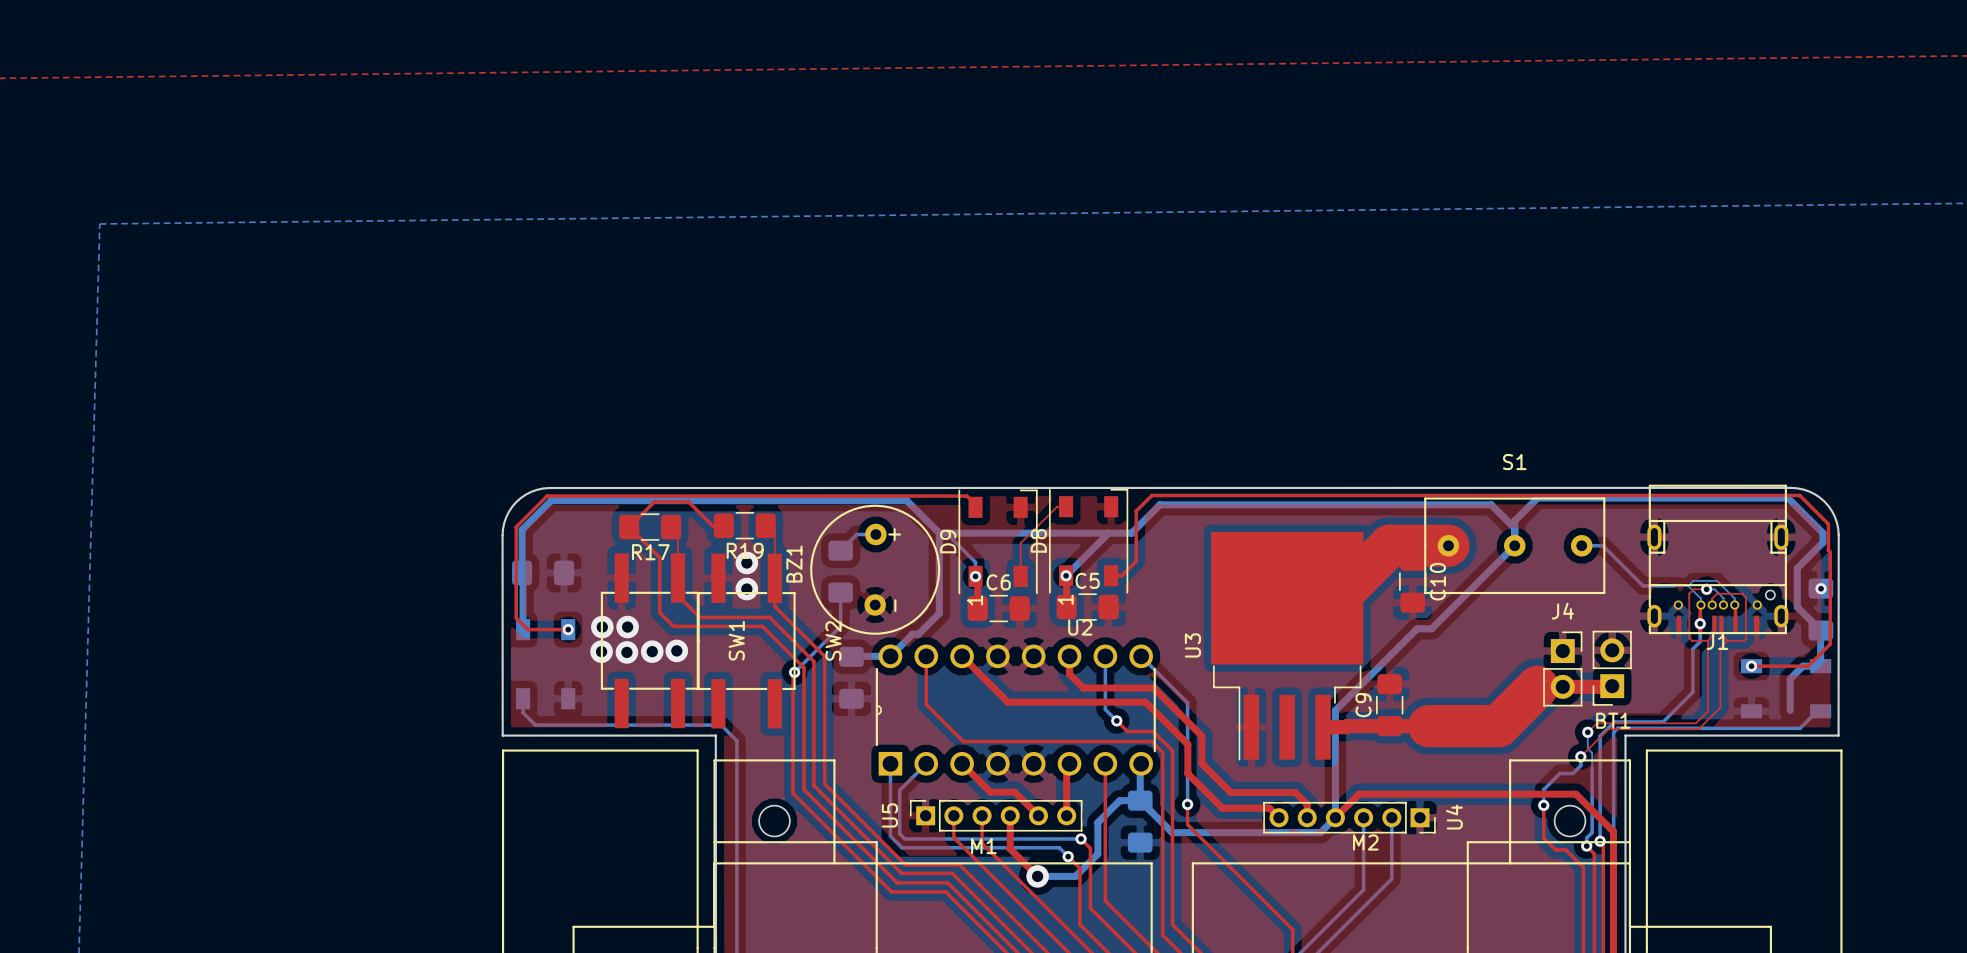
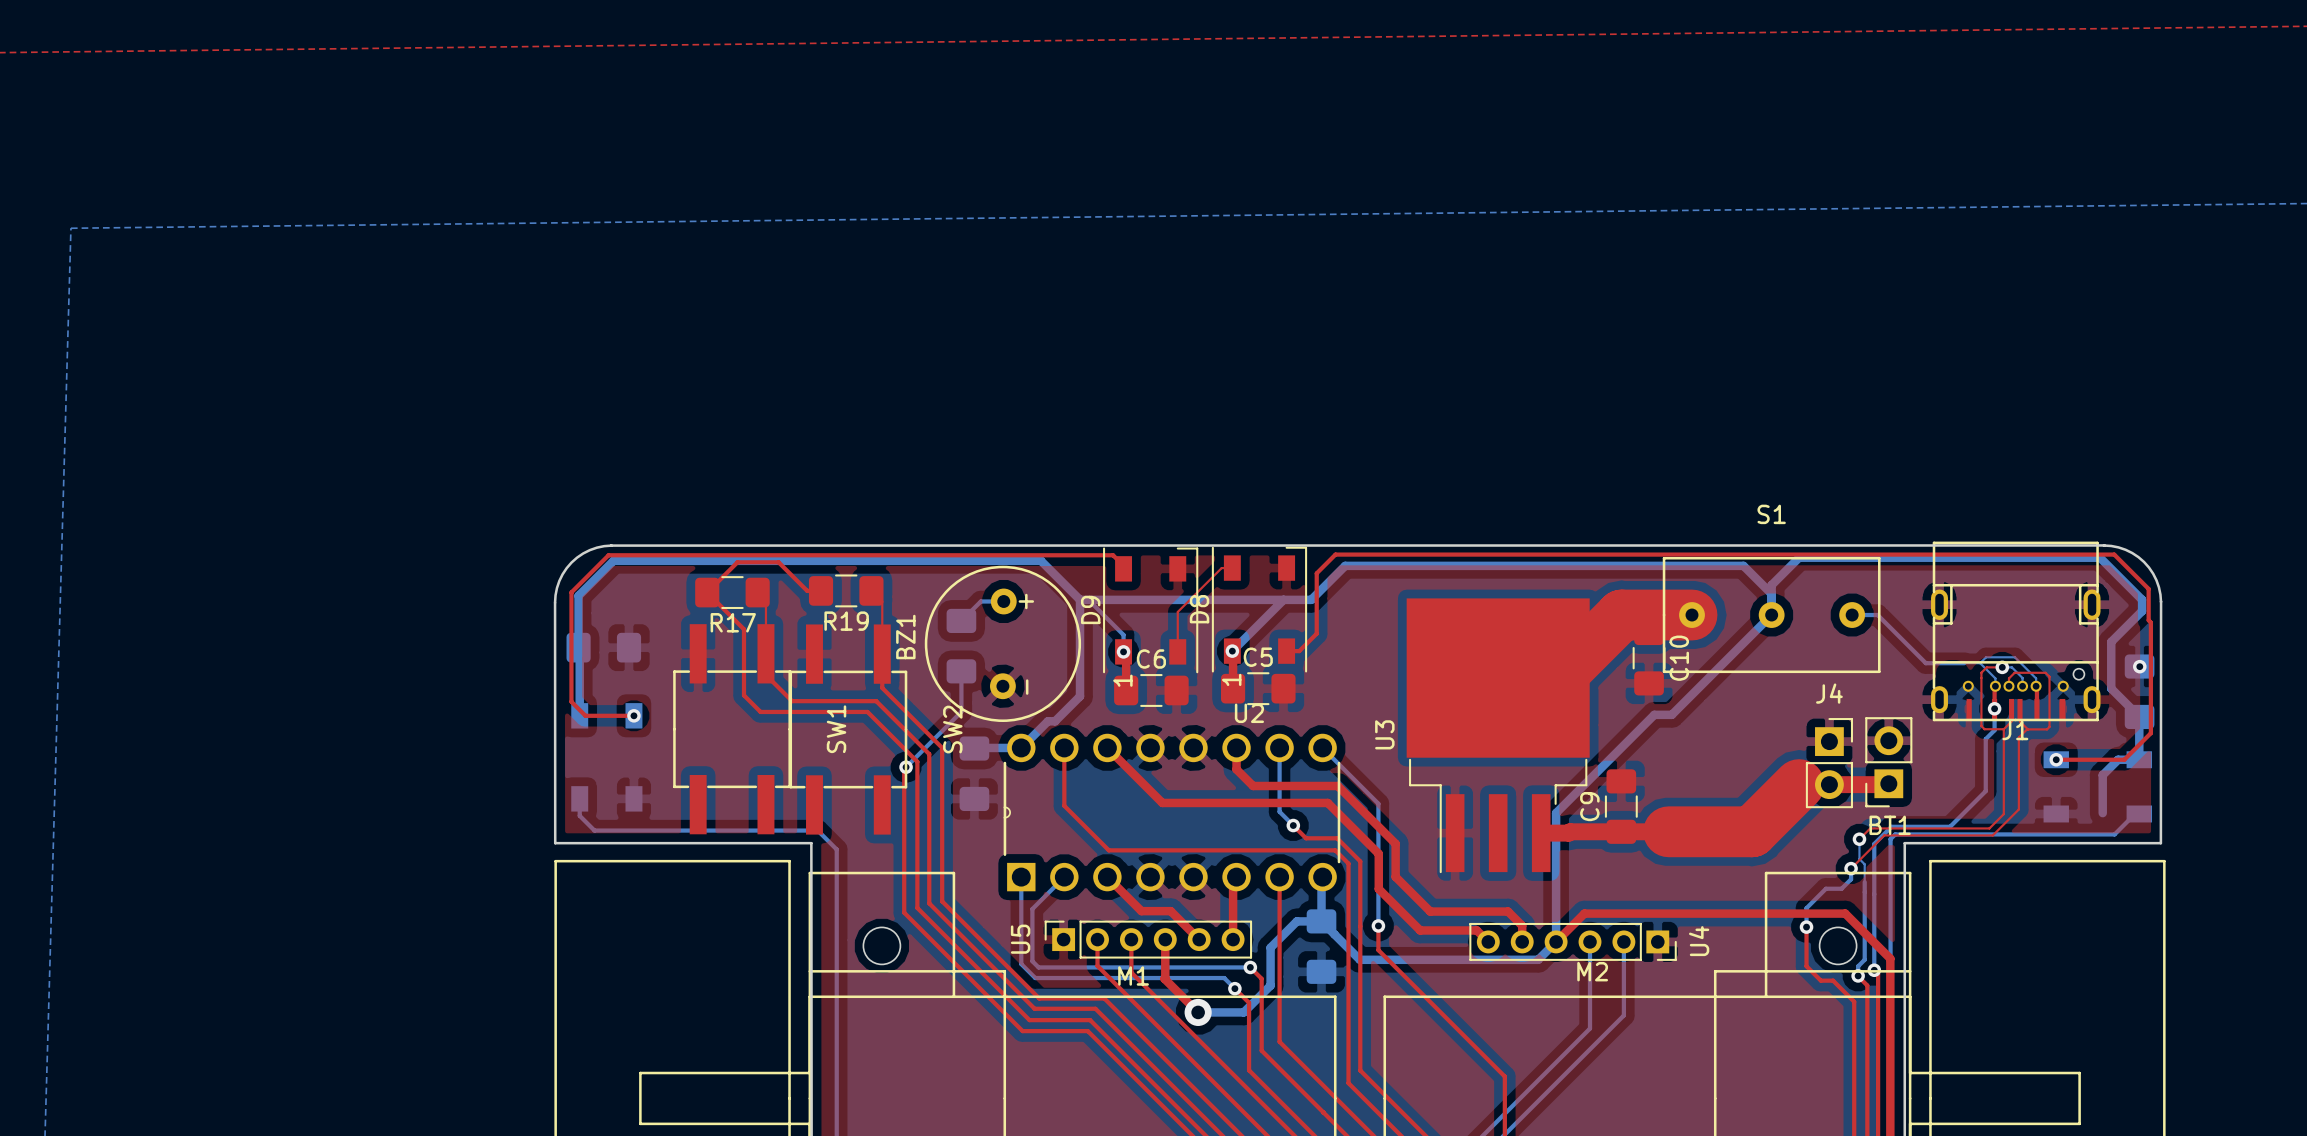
via: (746, 562) -> none
via: (746, 589) -> none
via: (602, 627) -> none
via: (627, 627) -> none
via: (676, 650) -> none
via: (601, 651) -> none
via: (652, 651) -> none
via: (626, 652) -> none

